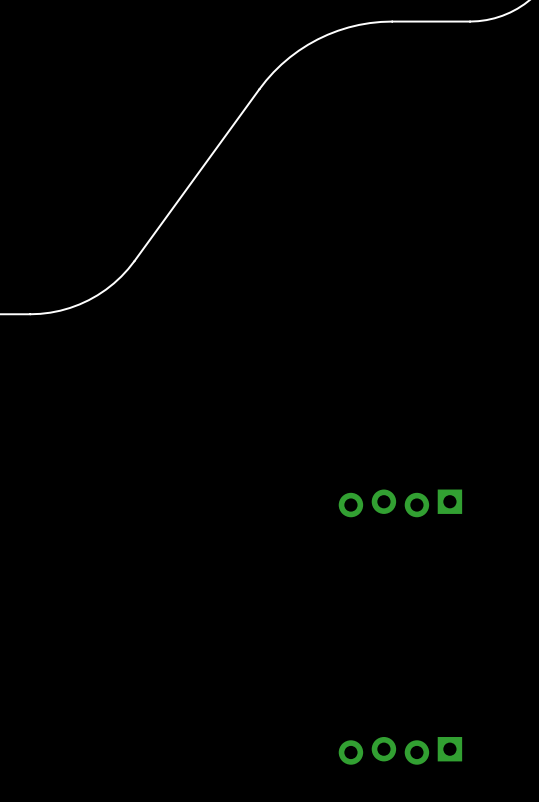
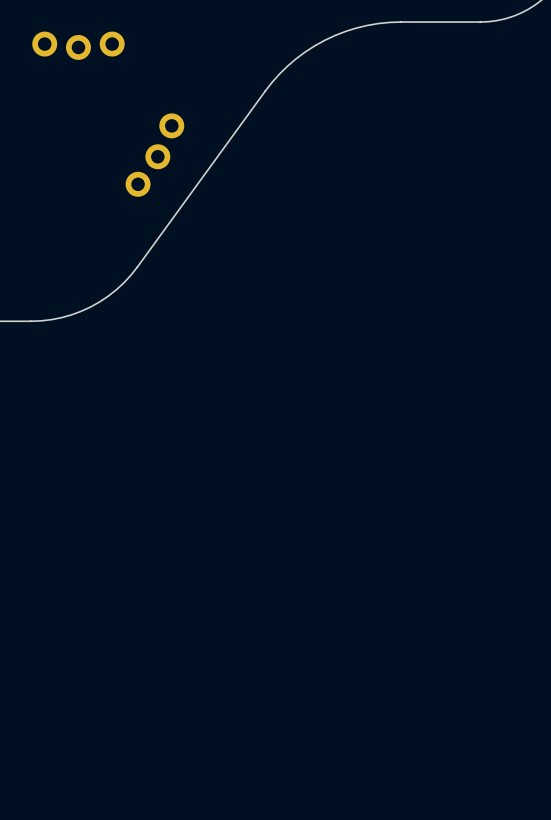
part: none -> (78, 45)
part: none -> (154, 155)
part: (400, 503) -> none
part: (400, 750) -> none

